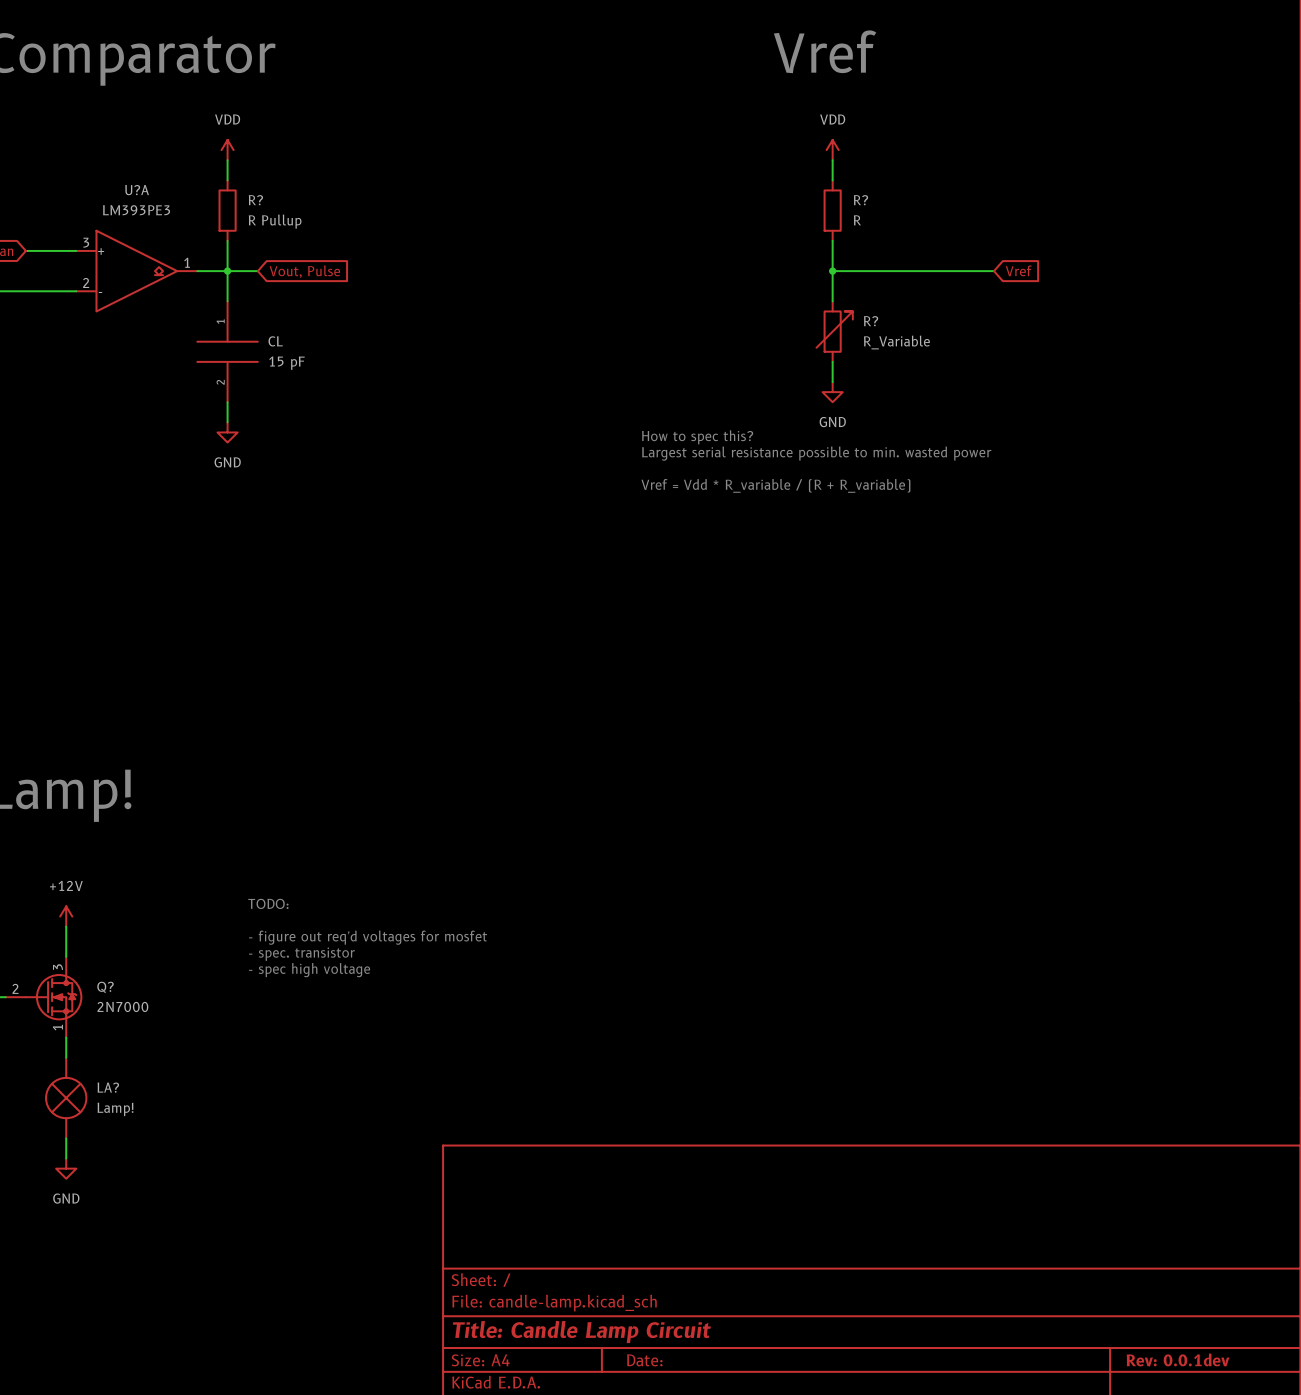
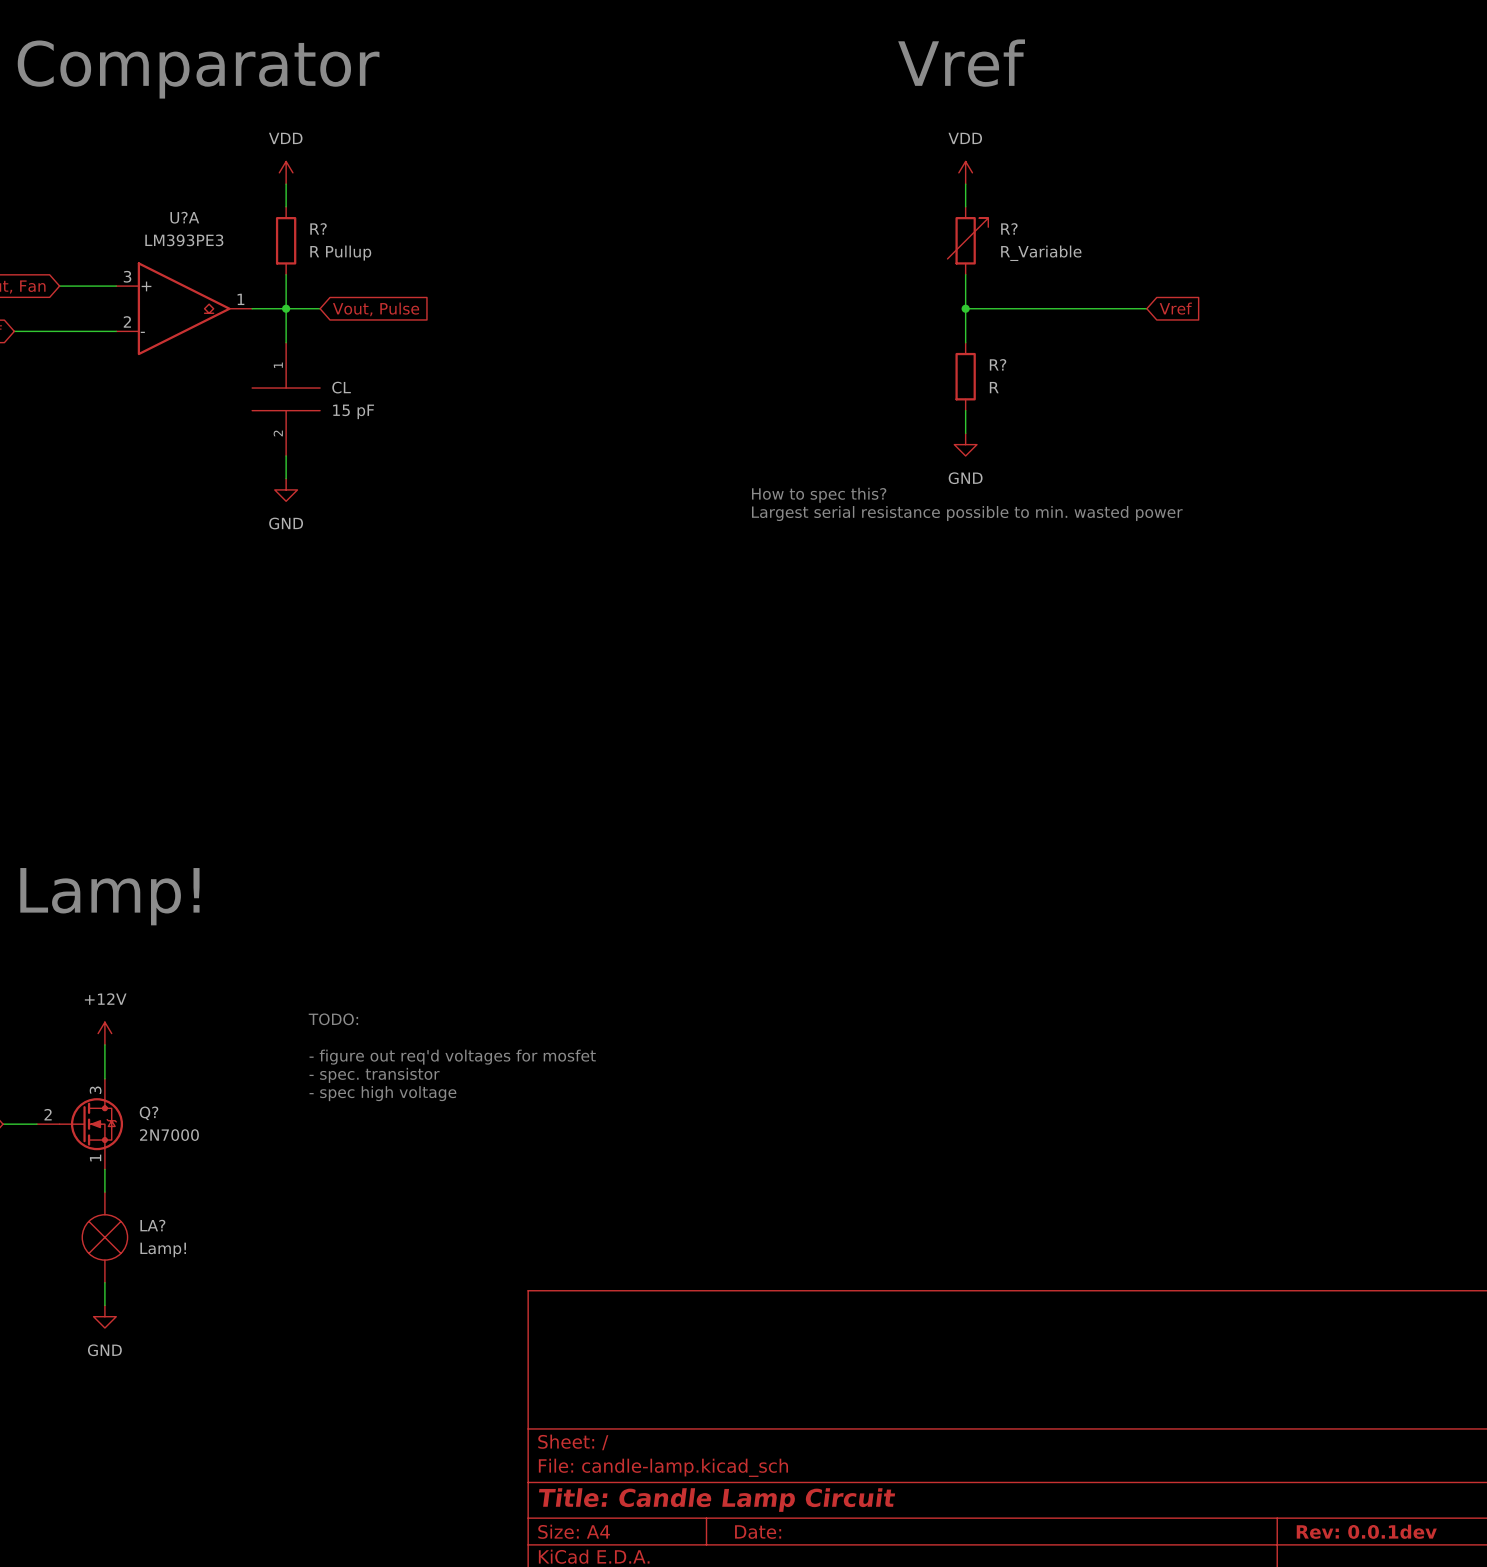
R? symbol: [823, 180, 842, 241] -> [947, 206, 989, 275]
R? value: R (857, 220) -> R_Variable (1041, 253)
R? symbol: [816, 301, 853, 362] -> [955, 342, 976, 411]
R? value: R_Variable (896, 342) -> R (994, 387)
text: Vref = Vdd * R_variable / (R + R_variable) (775, 485) -> none

